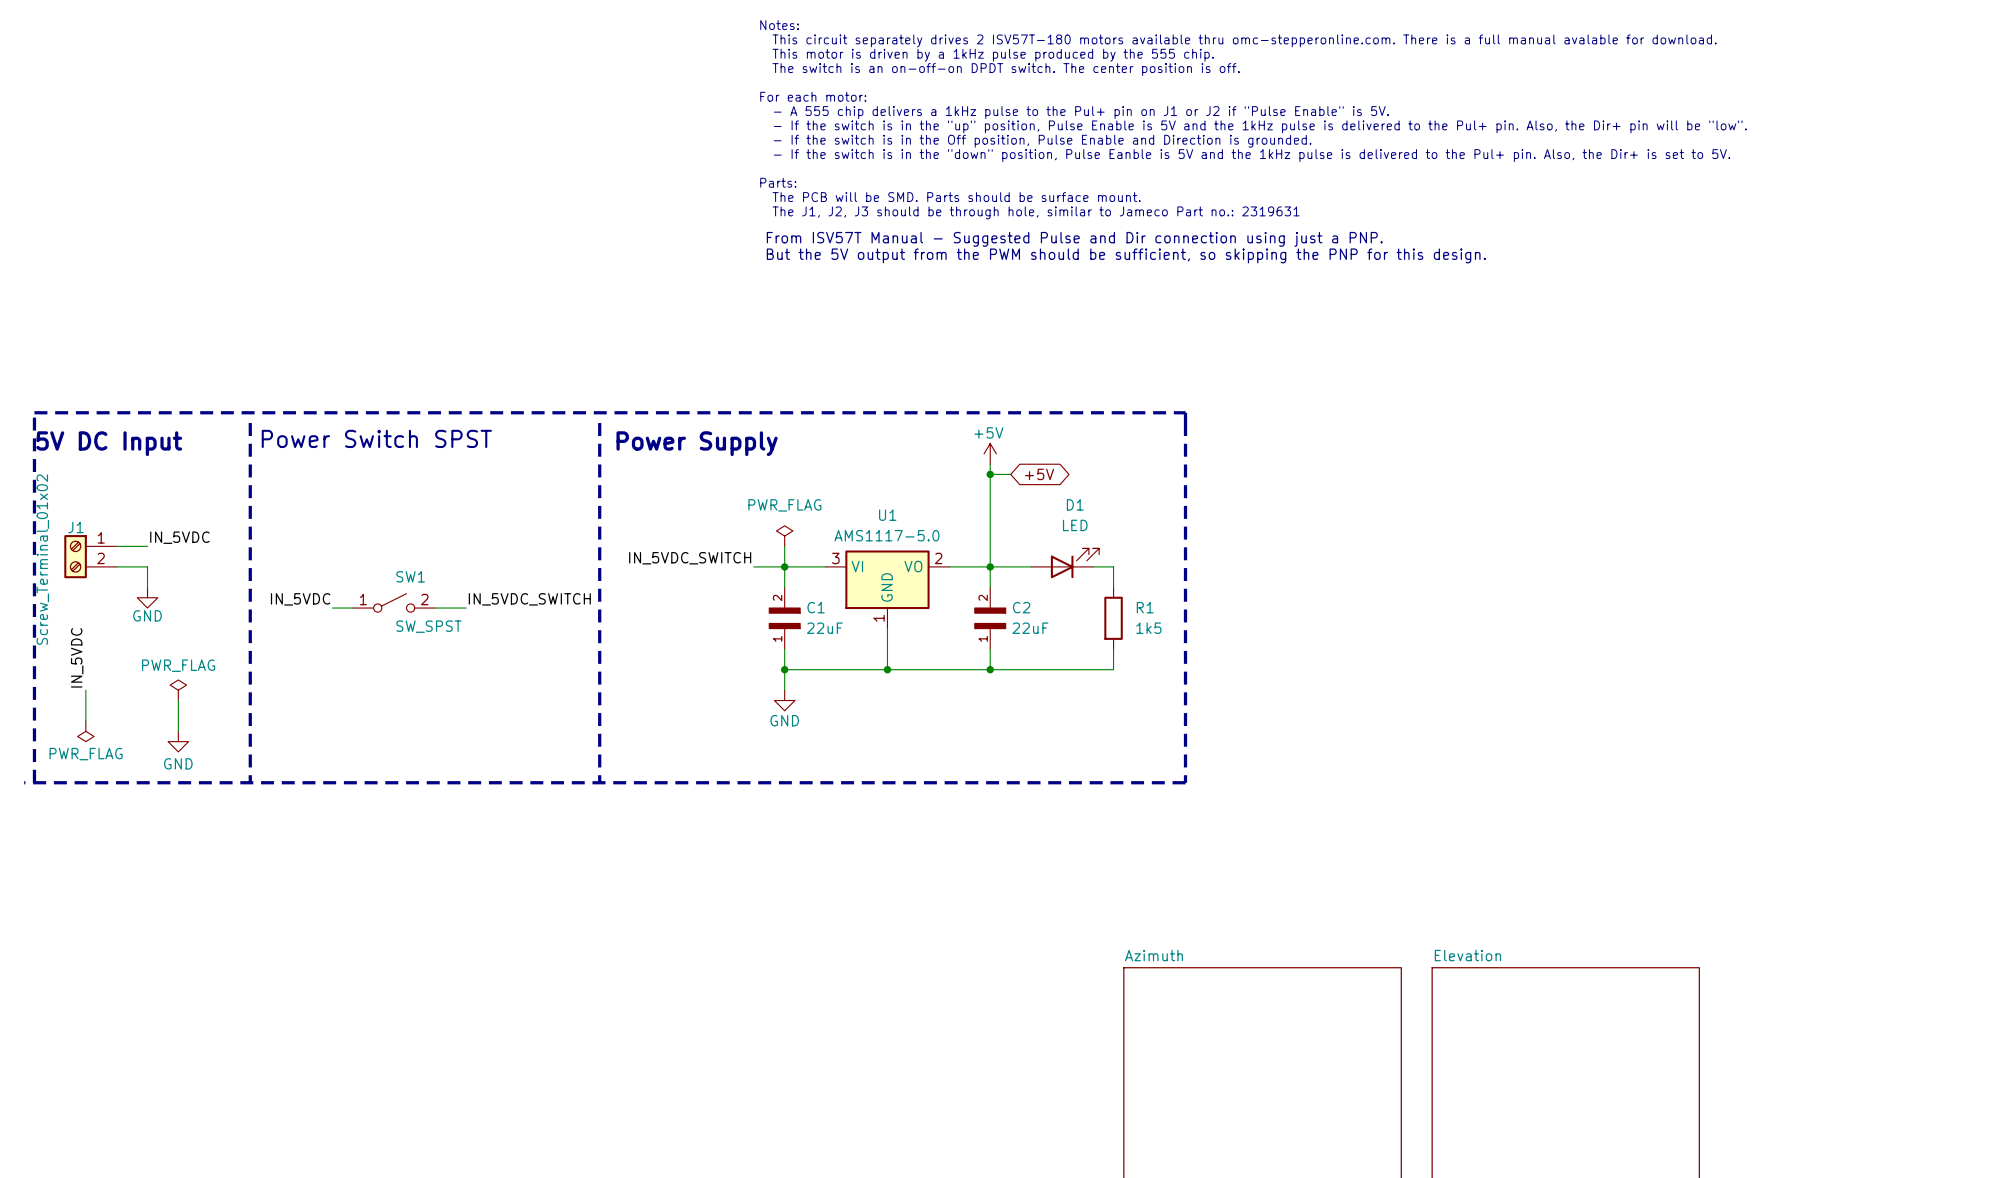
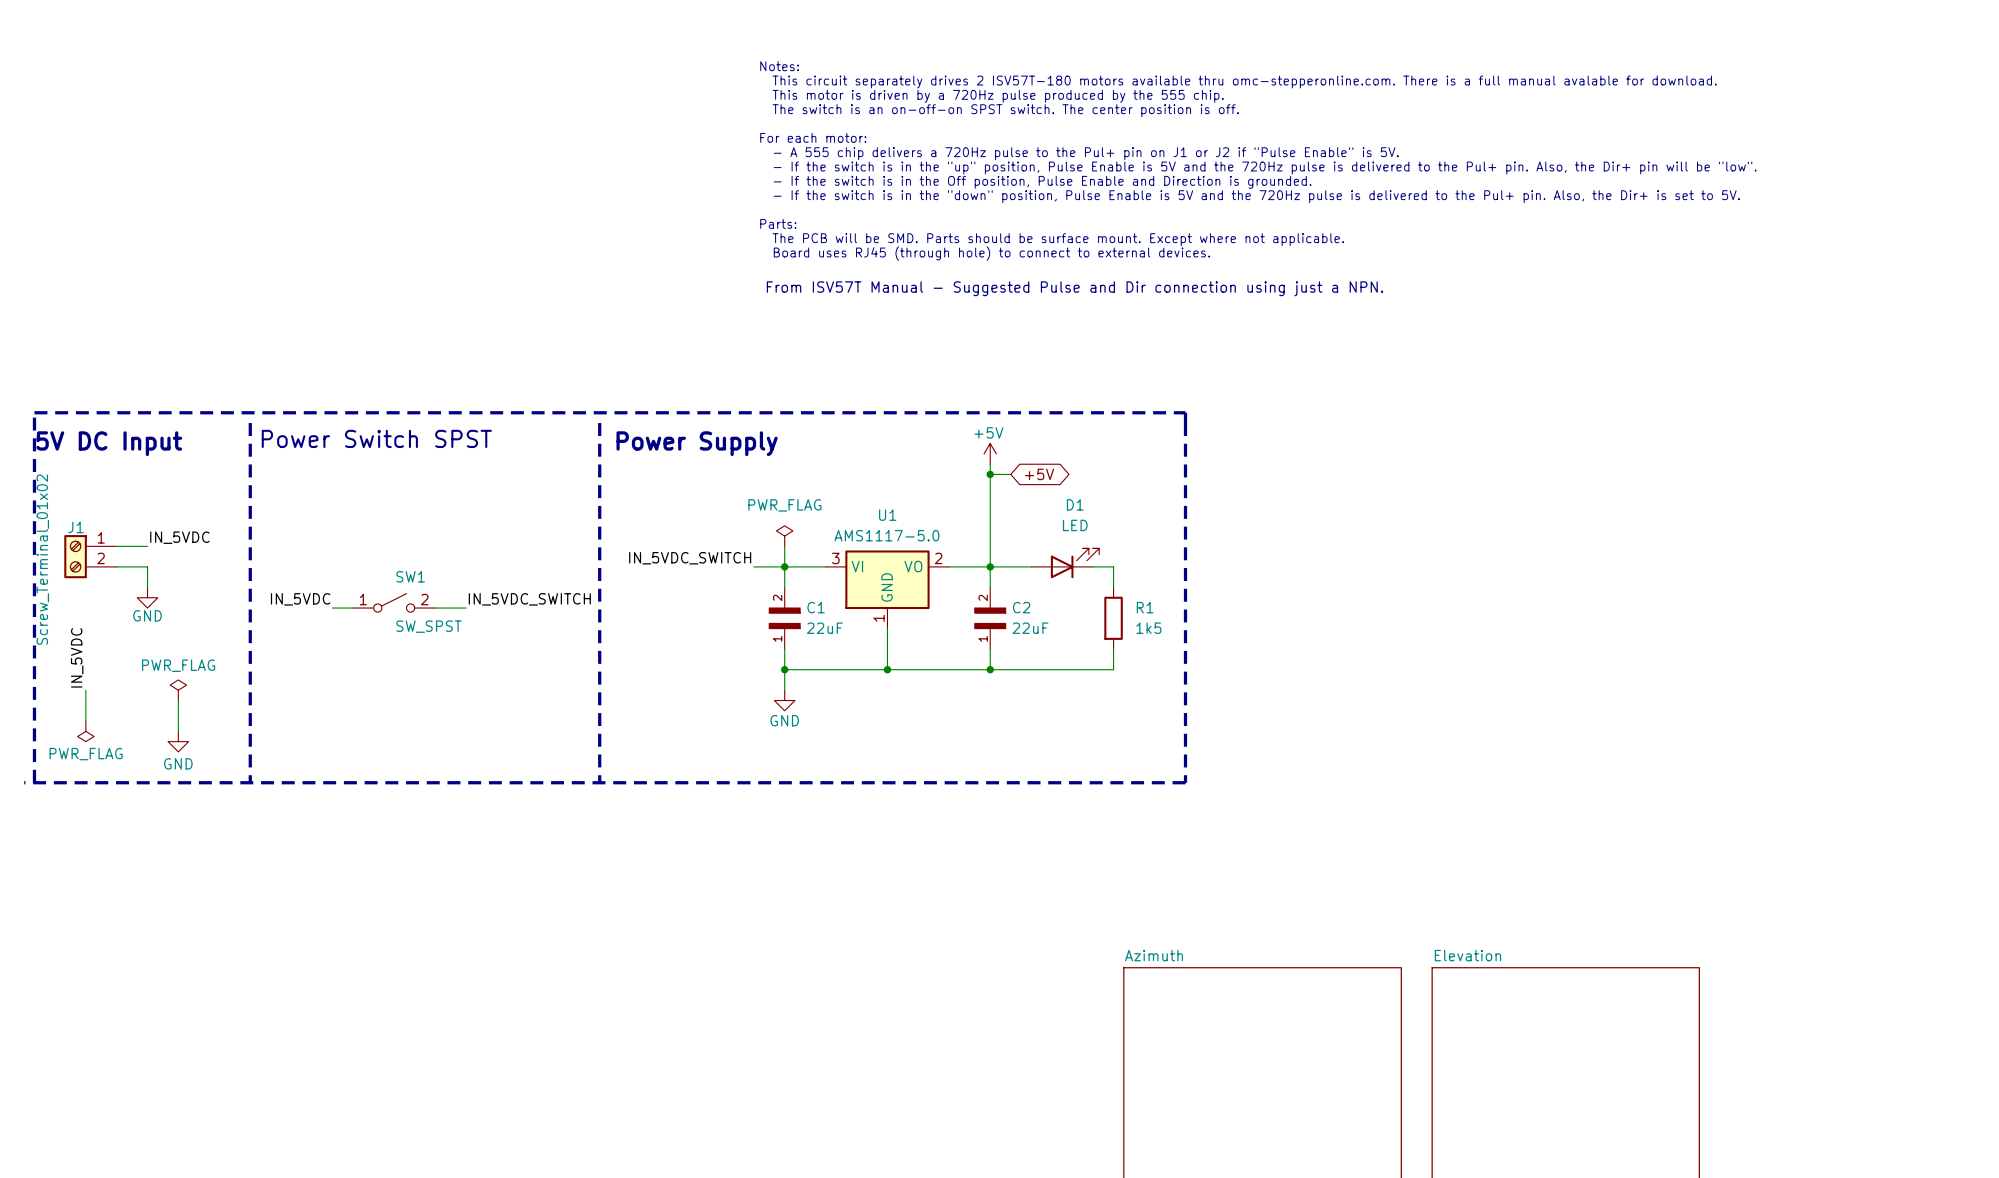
text position: Notes: (779, 25) -> Notes: (779, 66)
text position: This circuit separately drives 2 ISV57T-180 motors available thru omc-stepperonline.com. There is a full manual avalable for download. (1244, 40) -> This circuit separately drives 2 ISV57T-180 motors available thru omc-stepperonline.com. There is a full manual avalable for download. (1244, 82)
text: This motor is driven by a 1kHz pulse produced by the 555 chip. (993, 55) -> none
text: The switch is an on-off-on DPDT switch. The center position is off. (1006, 69) -> none
text position: For each motor: (813, 96) -> For each motor: (813, 137)
text: none -> This motor is driven by a 720Hz pulse produced by the 555 chip. (998, 96)
text: - A 555 chip delivers a 1kHz pulse to the Pul+ pin on J1 or J2 if "Pulse Enable" is 5V. (1081, 112) -> The switch is an on-off-on SPST switch. The center position is off. (1005, 110)
text: - If the switch is in the "up" position, Pulse Enable is 5V and the 1kHz pulse is delivered to the Pul+ pin. Also, the Dir+ pin will be "low". (1260, 126) -> none
text position: - If the switch is in the Off position, Pulse Enable and Direction is grounded. (1042, 141) -> - If the switch is in the Off position, Pulse Enable and Direction is grounded. (1042, 182)
text: - If the switch is in the "down" position, Pulse Eanble is 5V and the 1kHz pulse is delivered to the Pul+ pin. Also, the Dir+ is set to 5V. (1252, 155) -> - A 555 chip delivers a 720Hz pulse to the Pul+ pin on J1 or J2 if "Pulse Enable" is 5V. (1086, 153)
text: none -> - If the switch is in the "up" position, Pulse Enable is 5V and the 720Hz pulse is delivered to the Pul+ pin. Also, the Dir+ pin will be "low". (1265, 168)
text position: Parts: (778, 182) -> Parts: (778, 223)
text: The PCB will be SMD. Parts should be surface mount. (956, 197) -> - If the switch is in the "down" position, Pulse Enable is 5V and the 720Hz pulse is delivered to the Pul+ pin. Also, the Dir+ is set to 5V. (1256, 196)
text: The J1, J2, J3 should be through hole, similar to Jameco Part no.: 2319631 (1036, 212) -> none
text: none -> The PCB will be SMD. Parts should be surface mount. Except where not applicable. (1058, 239)
text: From ISV57T Manual - Suggested Pulse and Dir connection using just a PNP. (1074, 239) -> none
text: none -> Board uses RJ45 (through hole) to connect to external devices. (991, 253)
text: But the 5V output from the PWM should be sufficient, so skipping the PNP for this design. (1126, 255) -> none
text: none -> From ISV57T Manual - Suggested Pulse and Dir connection using just a NPN. (1074, 288)

